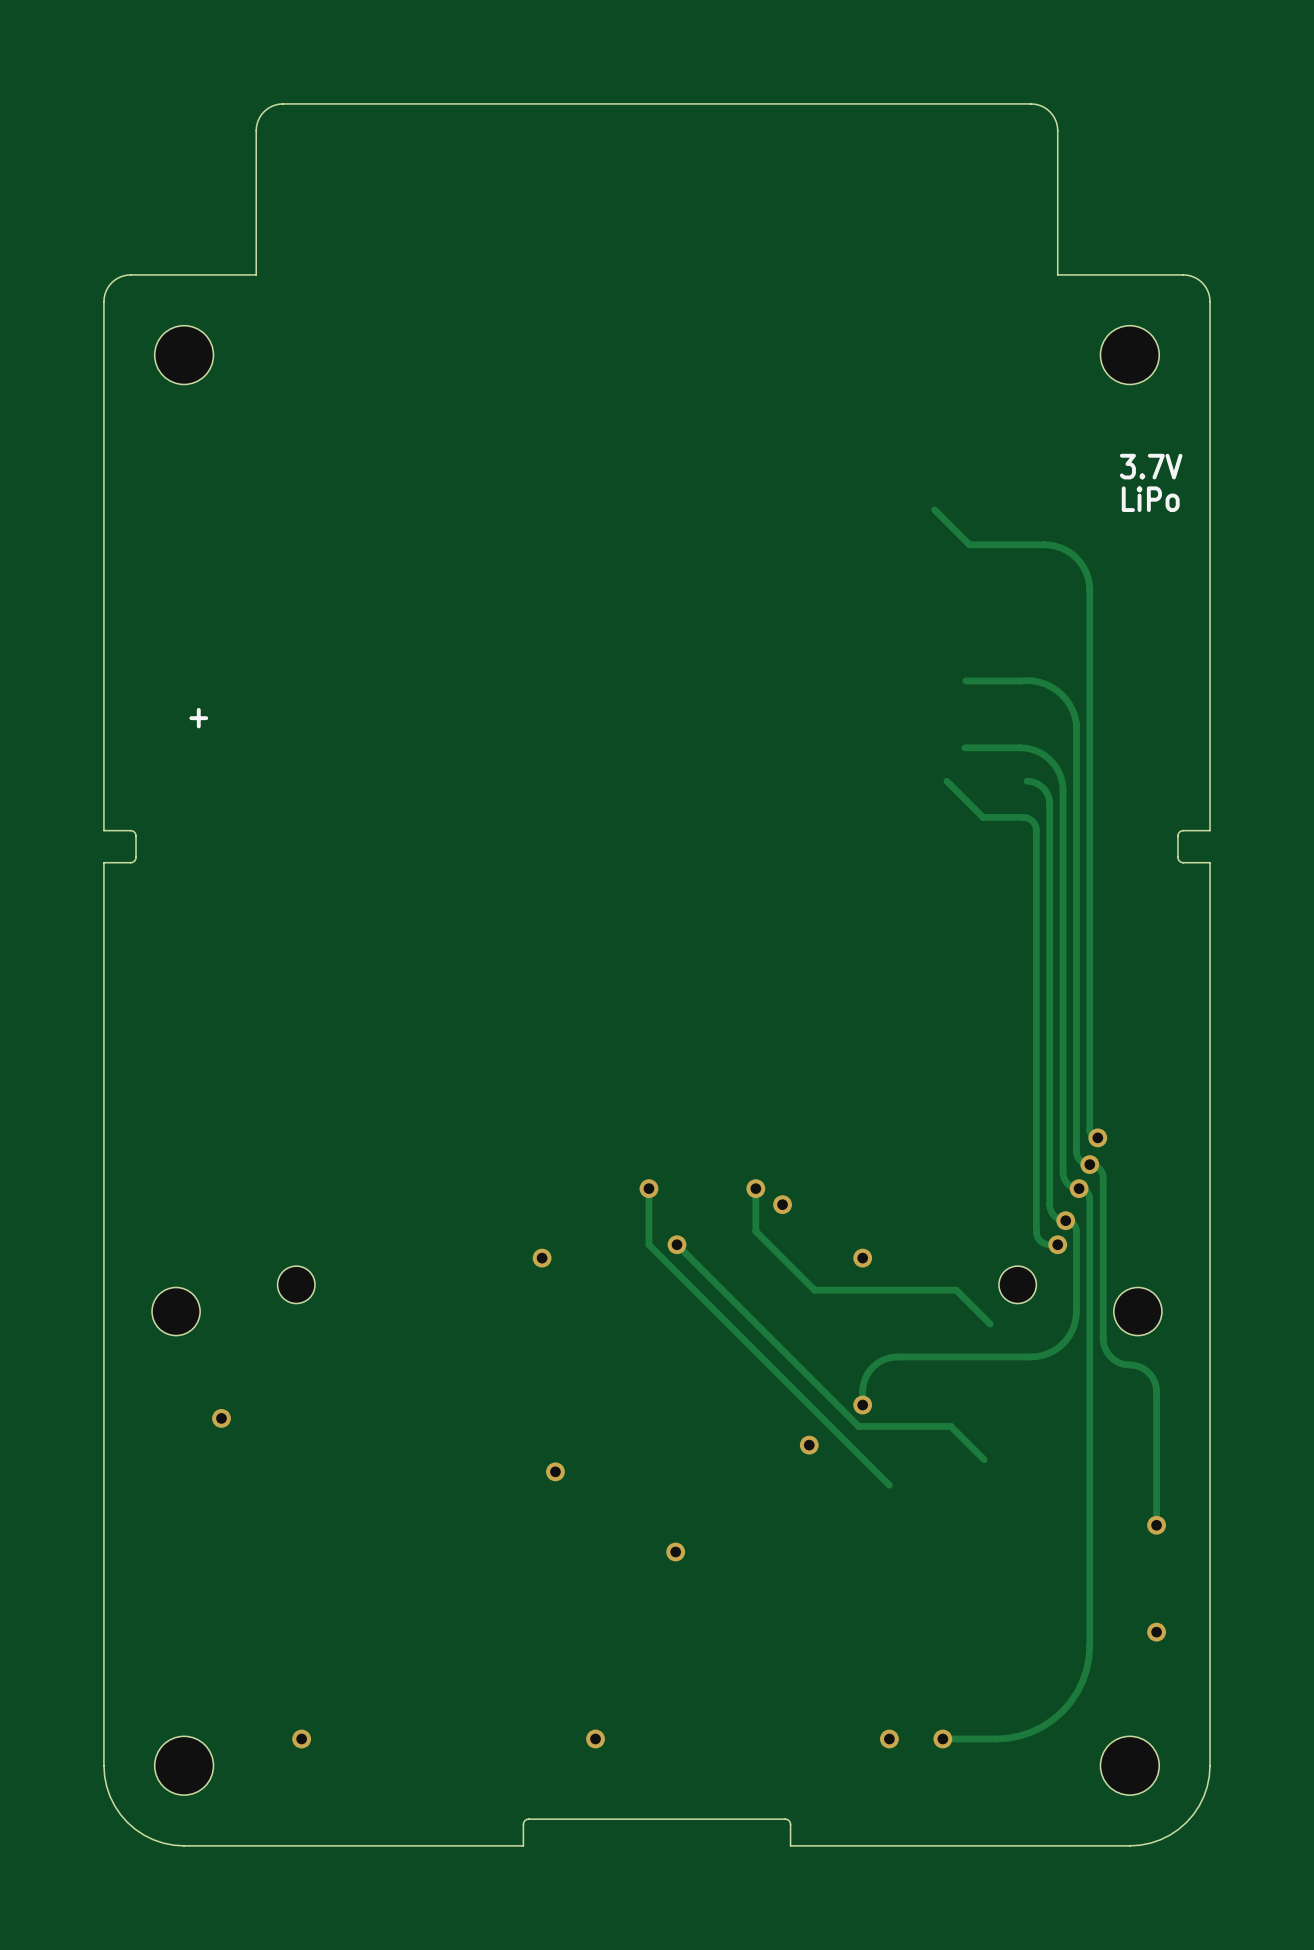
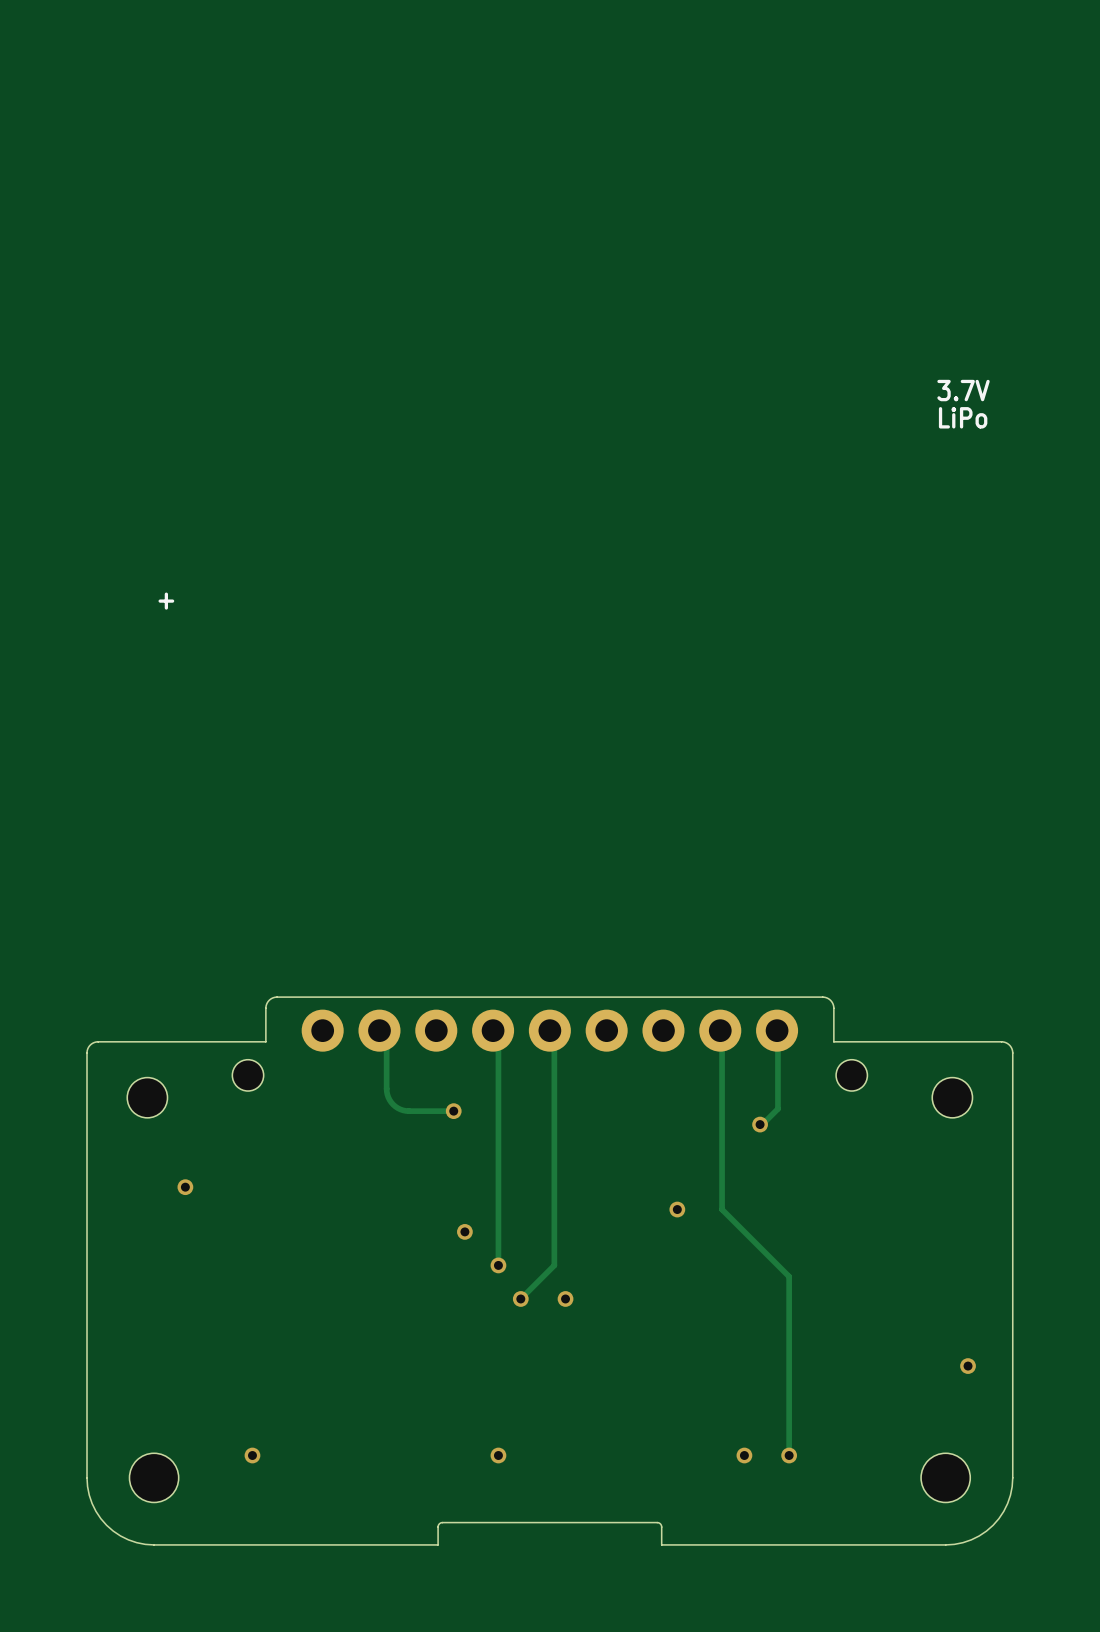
hole: (184, 355) -> none
hole: (1129, 355) -> none
track: (934, 509) (969, 544) (1056, 546) (1067, 550) (1076, 558) (1083, 567) (1088, 578) (1089, 590) (1089, 1129) (1092, 1135) (1097, 1137) -> none
track: (965, 681) (1039, 682) (1051, 687) (1062, 695) (1070, 705) (1075, 717) (1076, 1152) (1081, 1161) (1099, 1168) (1103, 1176) (1103, 1338) (1105, 1348) (1116, 1361) (1136, 1365) (1146, 1370) (1155, 1384) (1156, 1525) -> none
track: (964, 747) (1020, 747) (1036, 751) (1054, 764) (1062, 784) (1063, 1172) (1067, 1183) (1085, 1190) (1089, 1199) (1089, 1645) (1086, 1669) (1077, 1692) (1062, 1711) (1043, 1726) (1020, 1735) (1008, 1738) (942, 1739) -> (722, 1175) (722, 1209) (789, 1276) (789, 1455)
track: (946, 781) (982, 817) (1024, 817) (1032, 821) (1035, 827) (1036, 1231) (1038, 1238) (1043, 1242) (1057, 1244) -> none
track: (1027, 781) (1040, 785) (1046, 792) (1049, 800) (1049, 1204) (1054, 1216) (1071, 1222) (1076, 1228) (1074, 1323) (1070, 1334) (1063, 1343) (1053, 1350) (1036, 1356) (888, 1358) (876, 1364) (869, 1370) (863, 1382) (862, 1391) -> (720, 1030) (722, 1032) (722, 1164)
via: (1097, 1137) -> none
via: (1089, 1164) -> none
track: (648, 1188) (648, 1244) (889, 1485) -> none
via: (648, 1188) -> none
track: (755, 1188) (755, 1231) (814, 1290) (956, 1290) (990, 1324) -> none
via: (755, 1188) -> none
via: (1079, 1188) -> none
via: (782, 1204) -> none
via: (1065, 1220) -> none
track: none -> (379, 1030) (386, 1037) (386, 1091) (393, 1104) (406, 1110) (453, 1111)
track: none -> (493, 1030) (498, 1036) (498, 1265)
track: none -> (549, 1030) (554, 1035) (554, 1265) (520, 1298)
part: none -> (549, 1030)
track: none -> (777, 1030) (777, 1108) (760, 1124)
track: (677, 1244) (858, 1426) (950, 1426) (984, 1459) -> none
via: (677, 1244) -> none
via: (1057, 1244) -> none
via position: (542, 1258) -> (453, 1111)
via: (862, 1258) -> none
board edge: (1210, 1258) (1210, 862) (1182, 862) (1177, 857) (1178, 835) (1180, 831) (1210, 830) (1209, 298) (1202, 282) (1186, 275) (1057, 274) (1057, 127) (1054, 117) (1047, 109) (1031, 103) (279, 104) (264, 111) (256, 127) (256, 274) (127, 275) (117, 278) (109, 285) (103, 301) (103, 830) (133, 831) (135, 835) (136, 857) (131, 862) (103, 862) (103, 1258) -> (1012, 1053) (1009, 1045) (1001, 1041) (833, 1041) (833, 1005) (829, 999) (822, 997) (275, 997) (269, 1000) (266, 1005) (265, 1041) (98, 1041) (90, 1045) (87, 1053)
via: none -> (760, 1124)
via: (862, 1405) -> none
via: none -> (498, 1265)
via: (1156, 1525) -> none
via: none -> (520, 1298)

